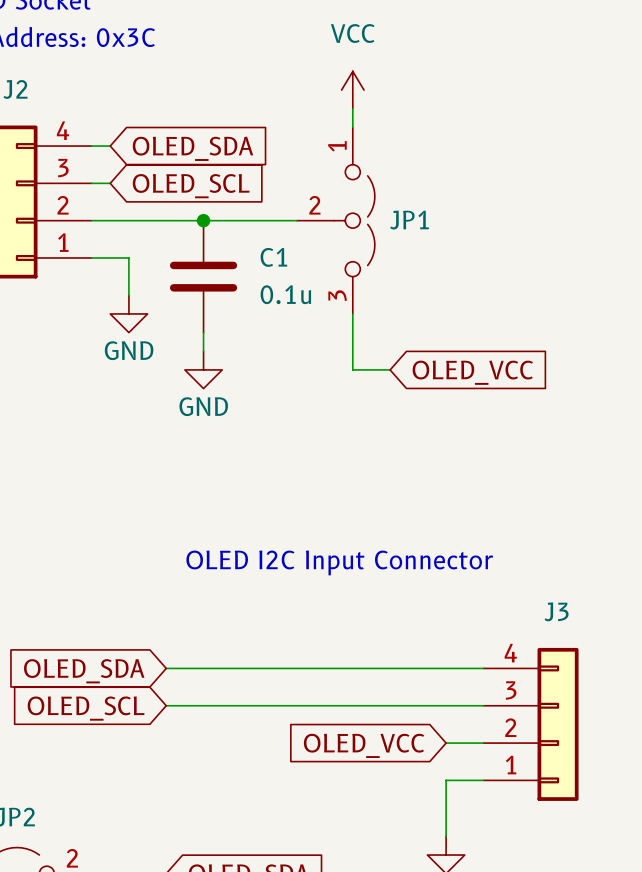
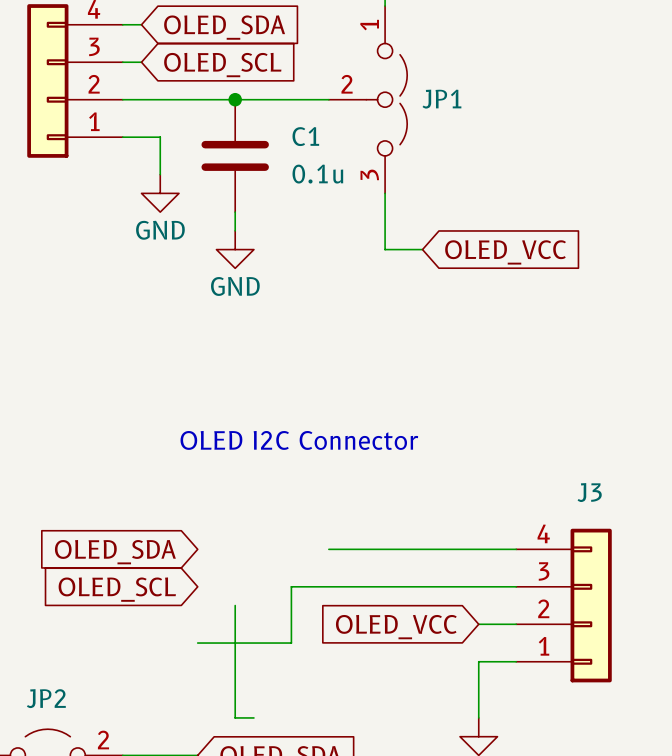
text: OLED I2C Input Connector (339, 562) -> OLED I2C Connector (299, 440)
wire: (166, 668) (296, 668) -> none
wire: (166, 705) (259, 705) -> (197, 643) (291, 643) (291, 586)
wire: none -> (235, 605) (235, 717) (253, 717)

